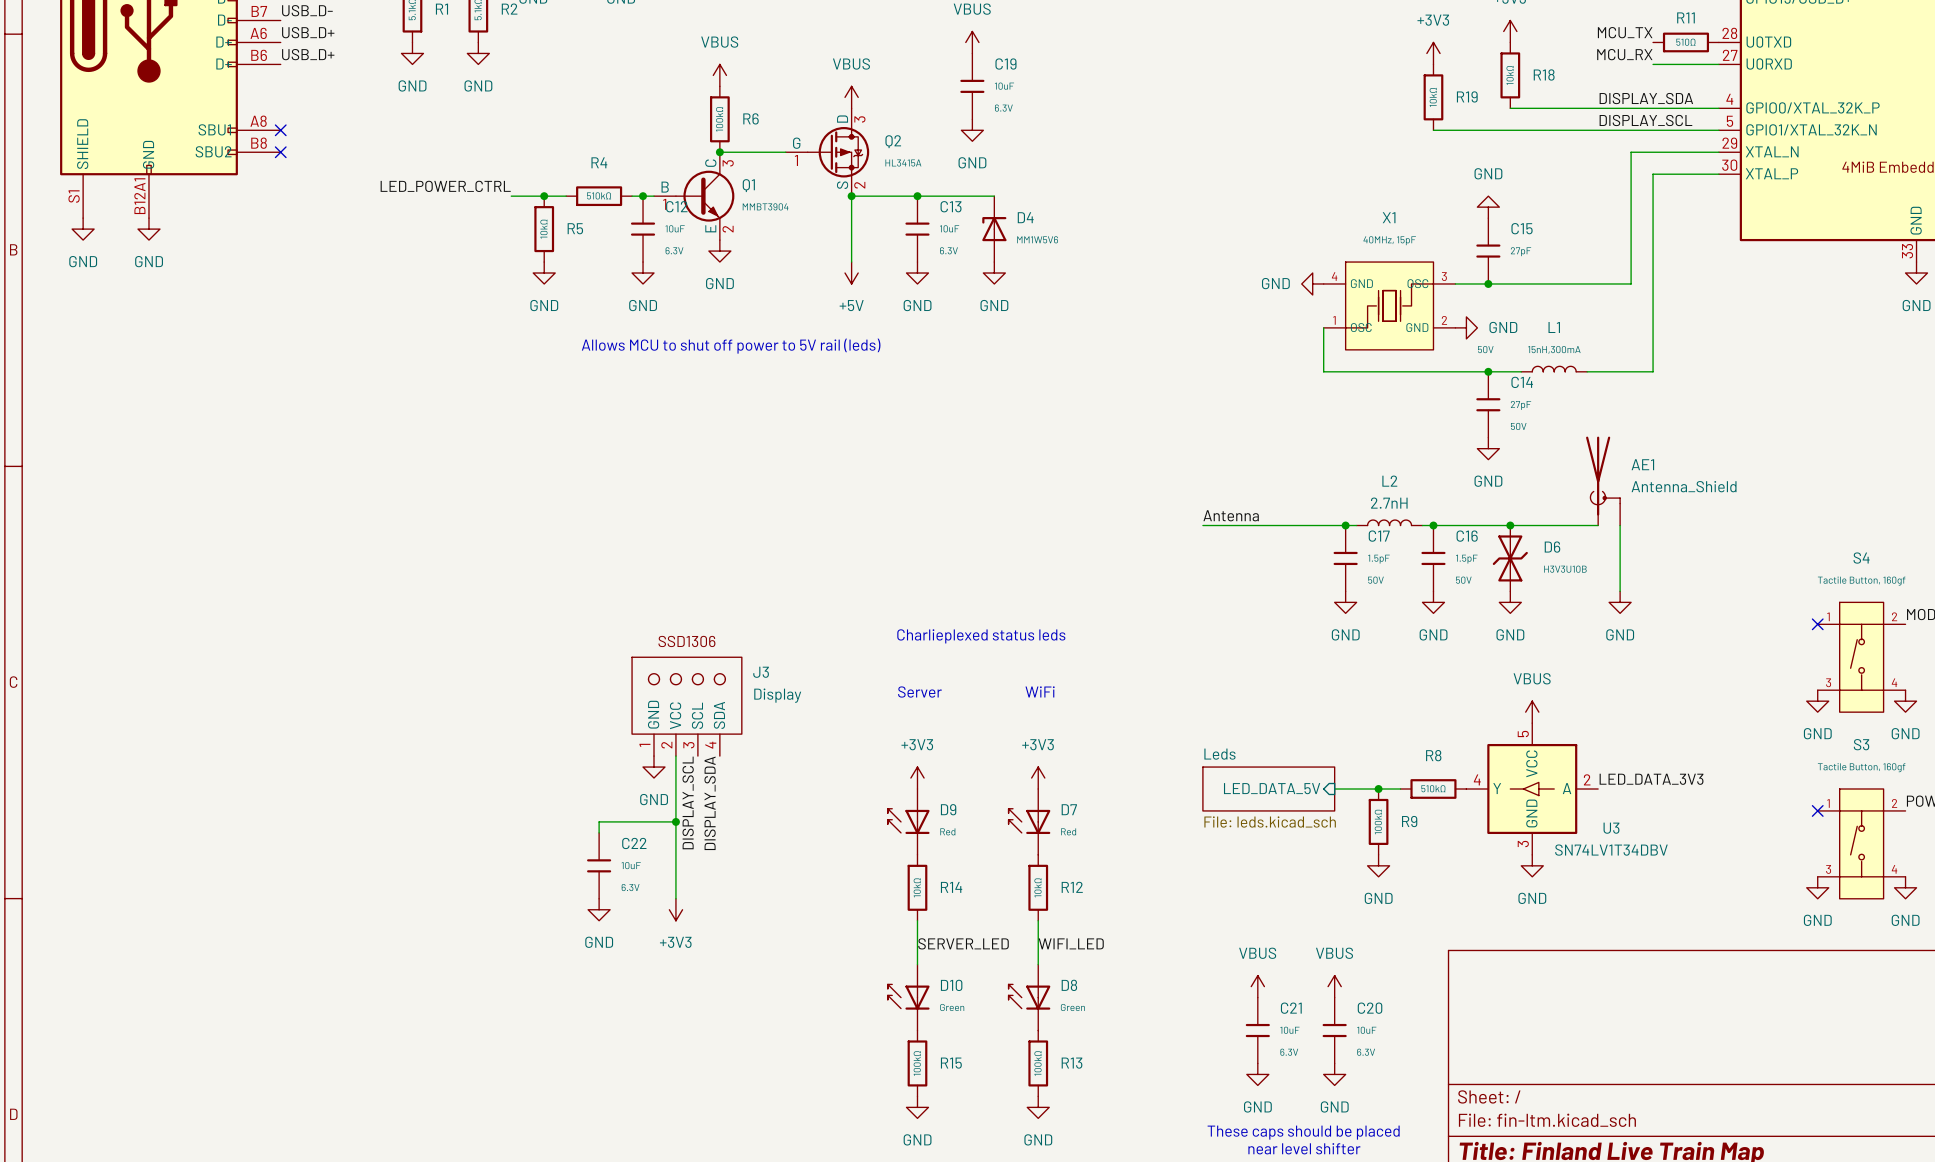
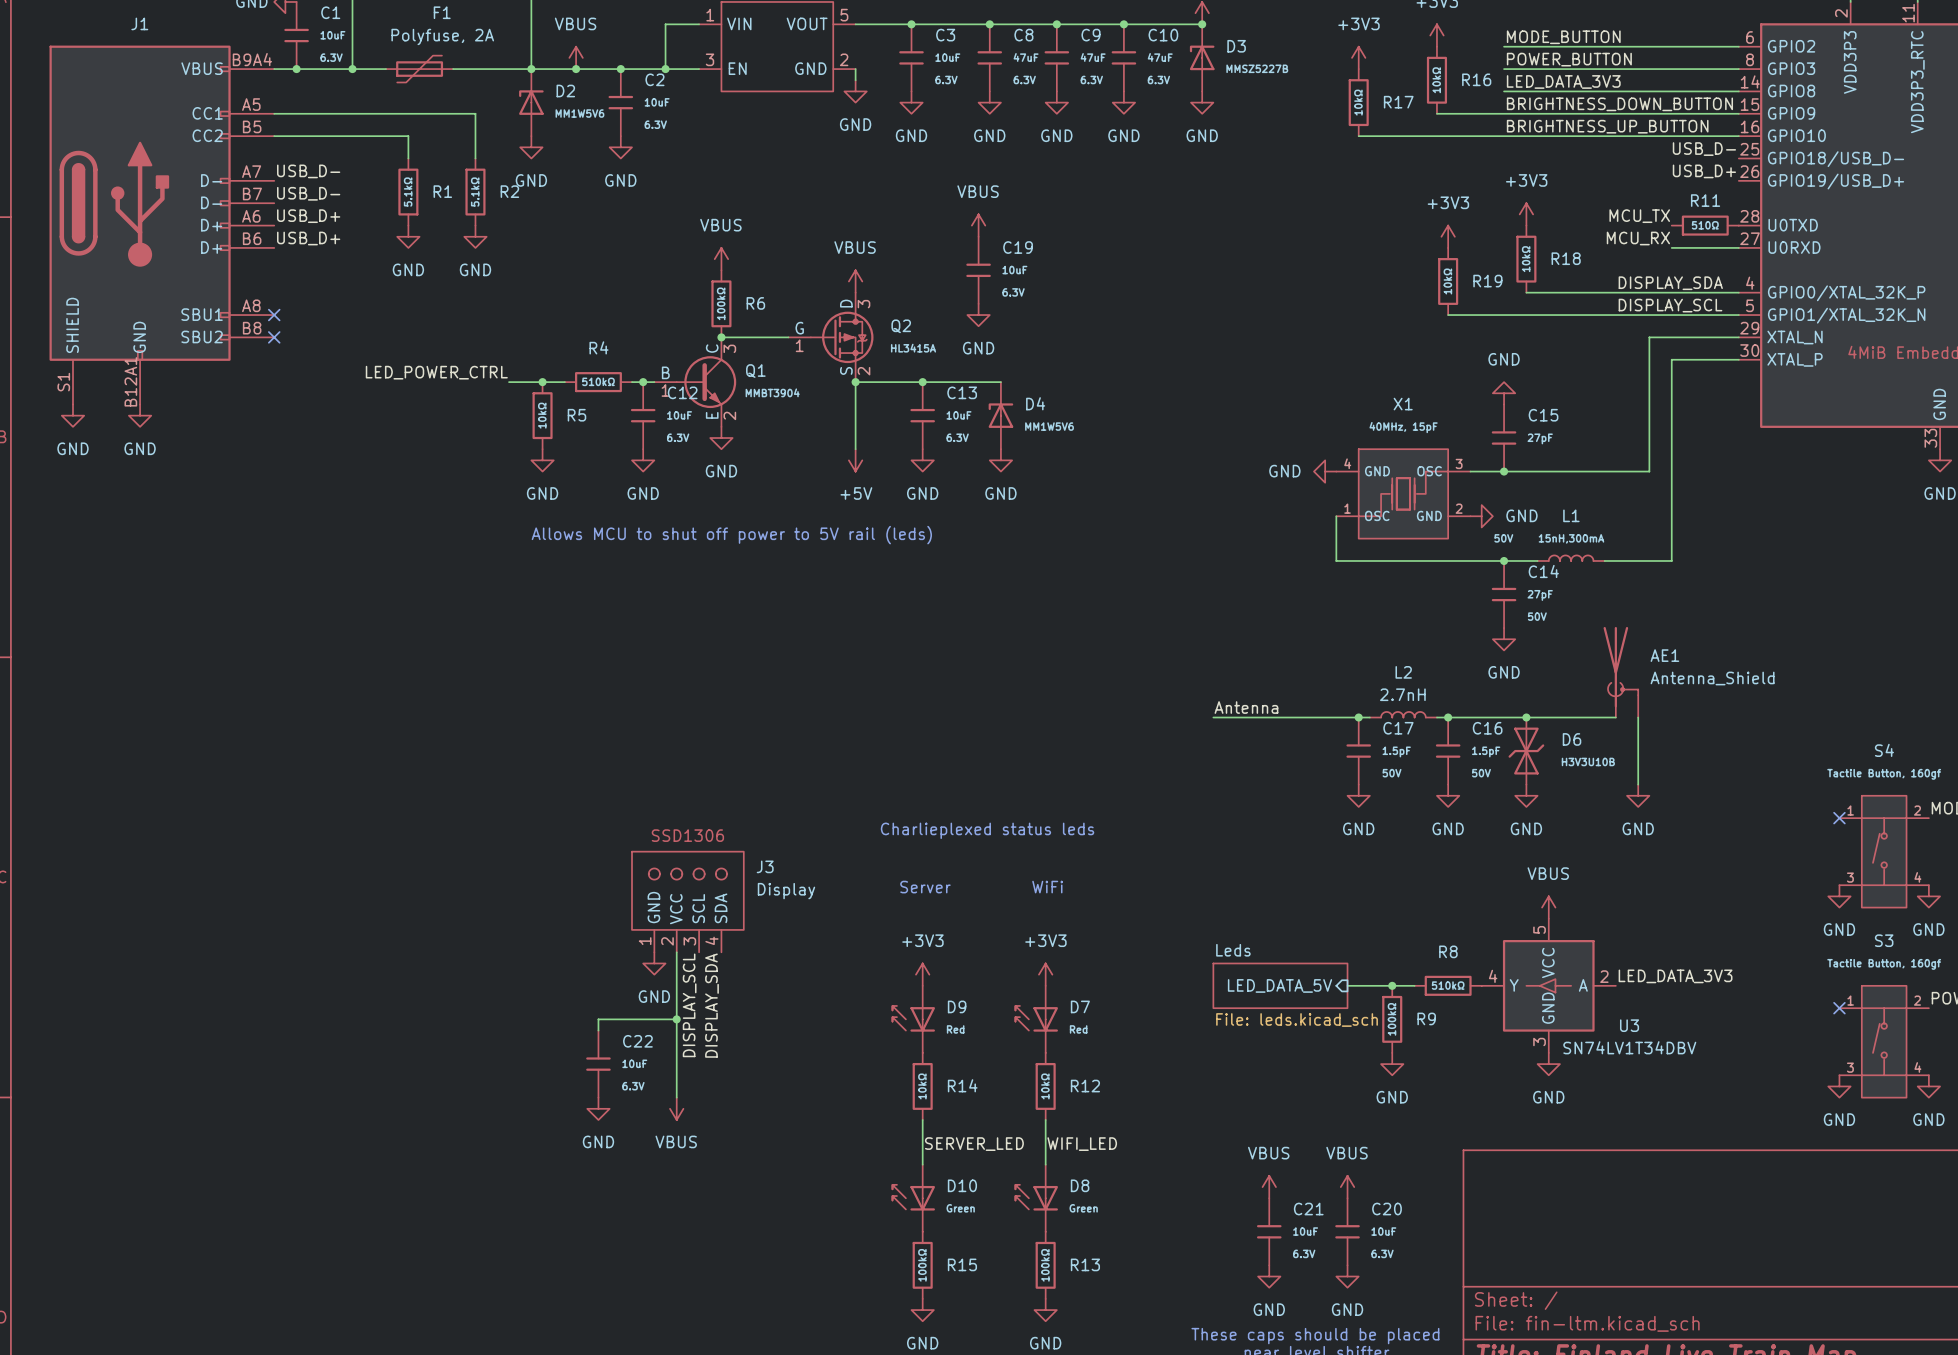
power symbol: +3V3 (675, 909) -> VBUS (676, 1108)

